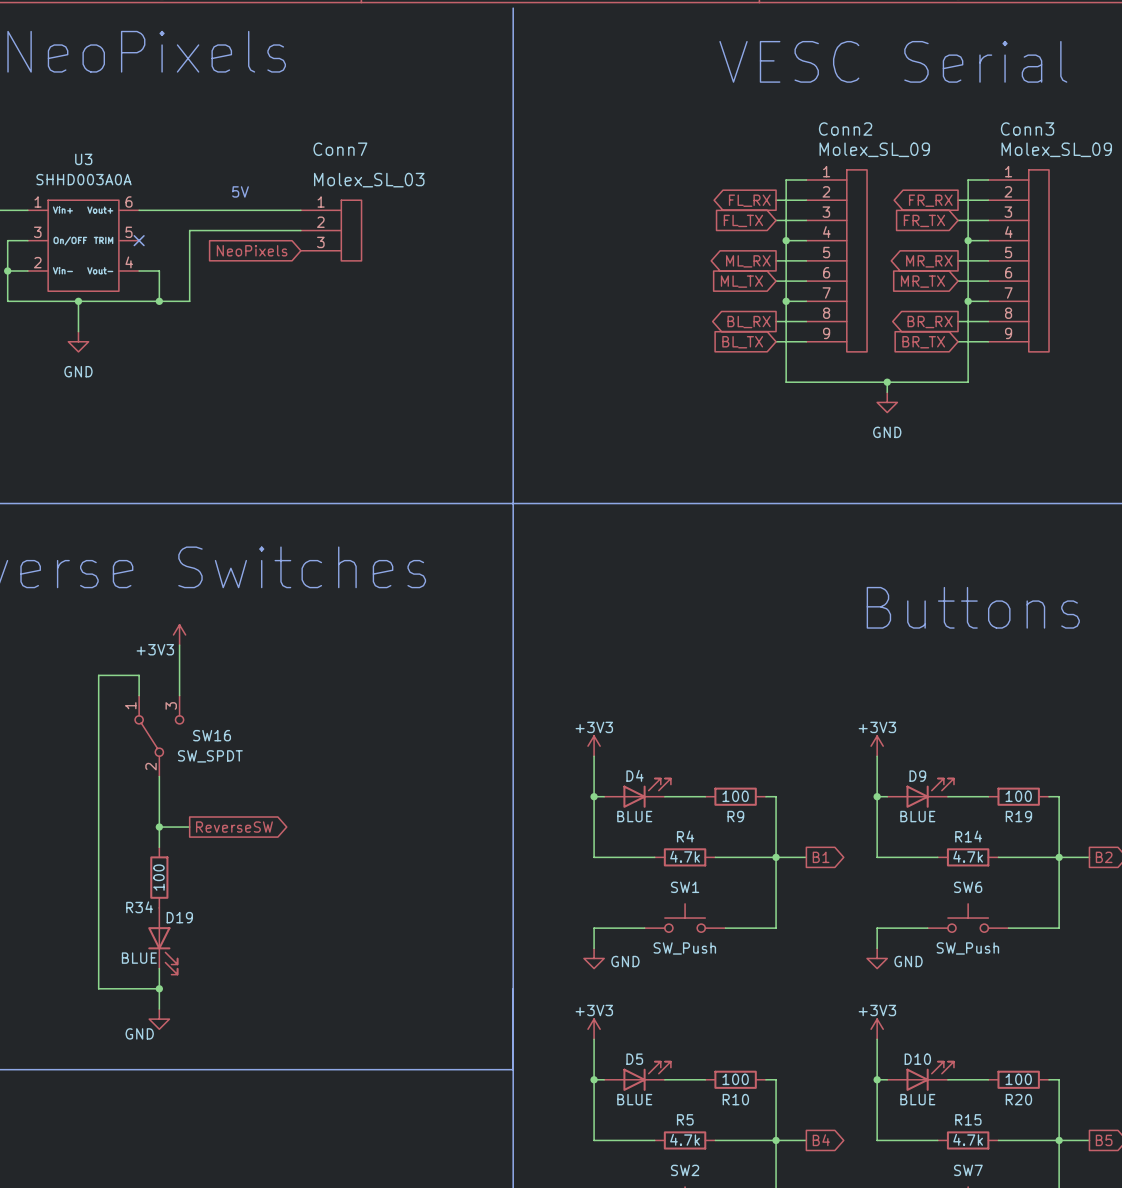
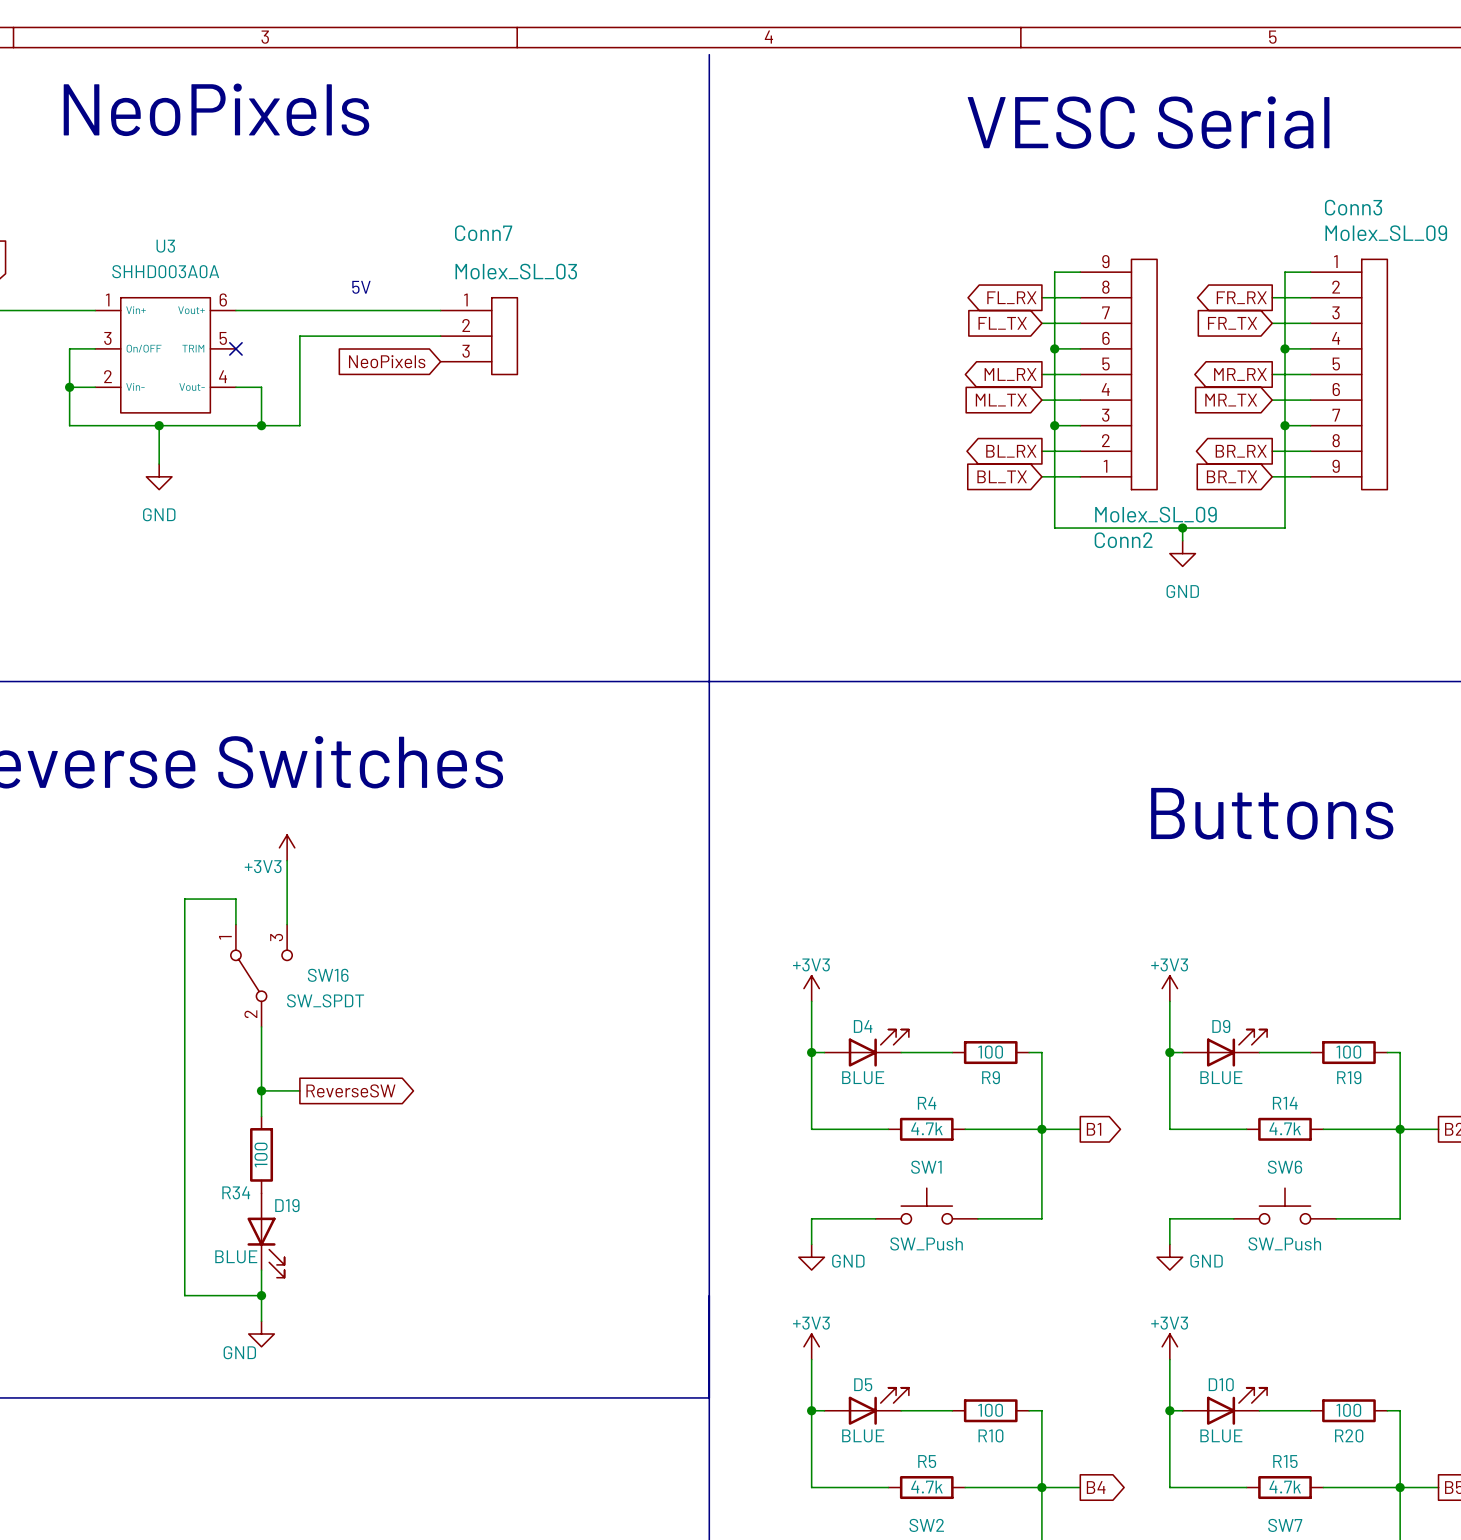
Conn2 flip: as is (856, 260) -> up-down (1144, 374)

